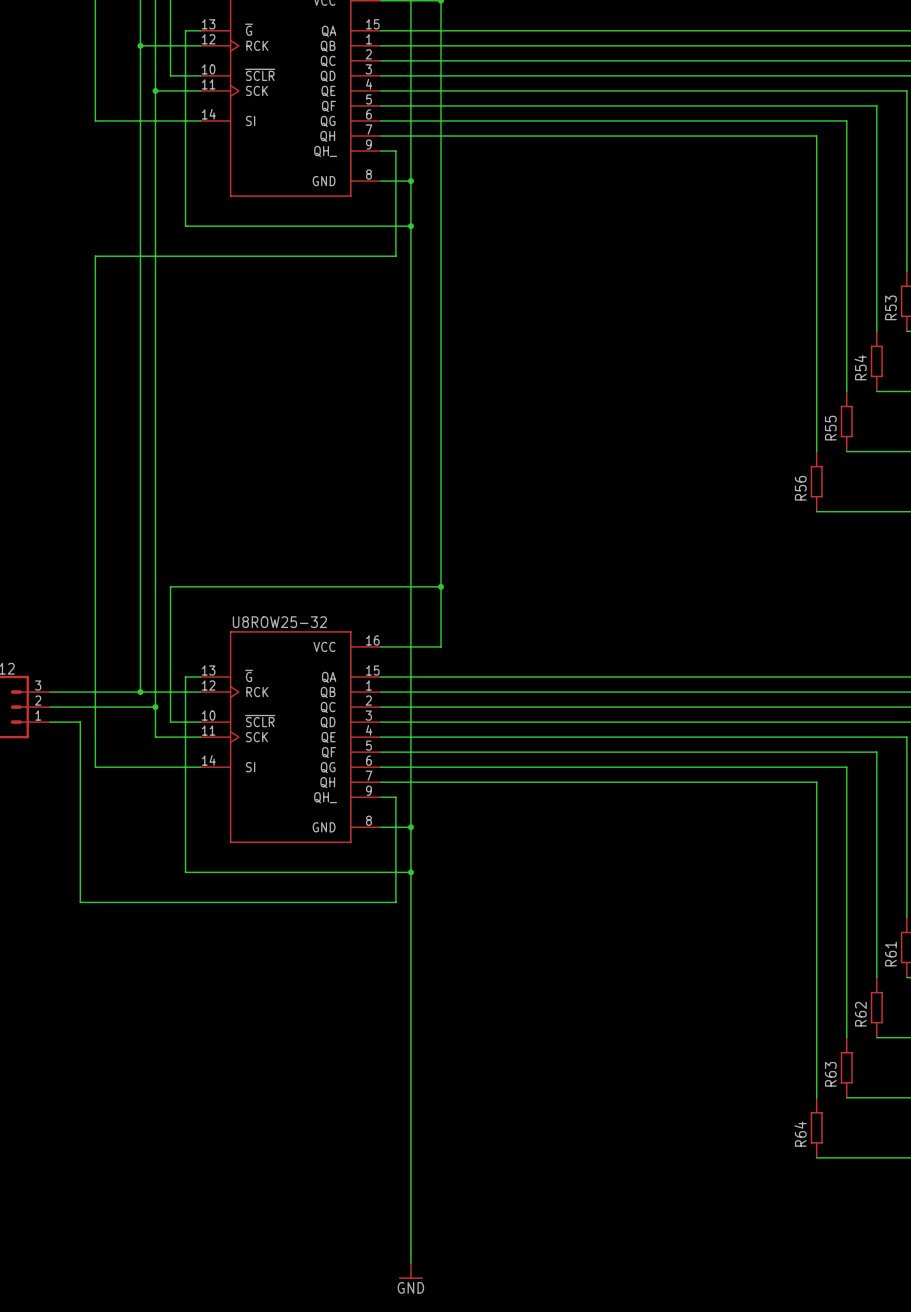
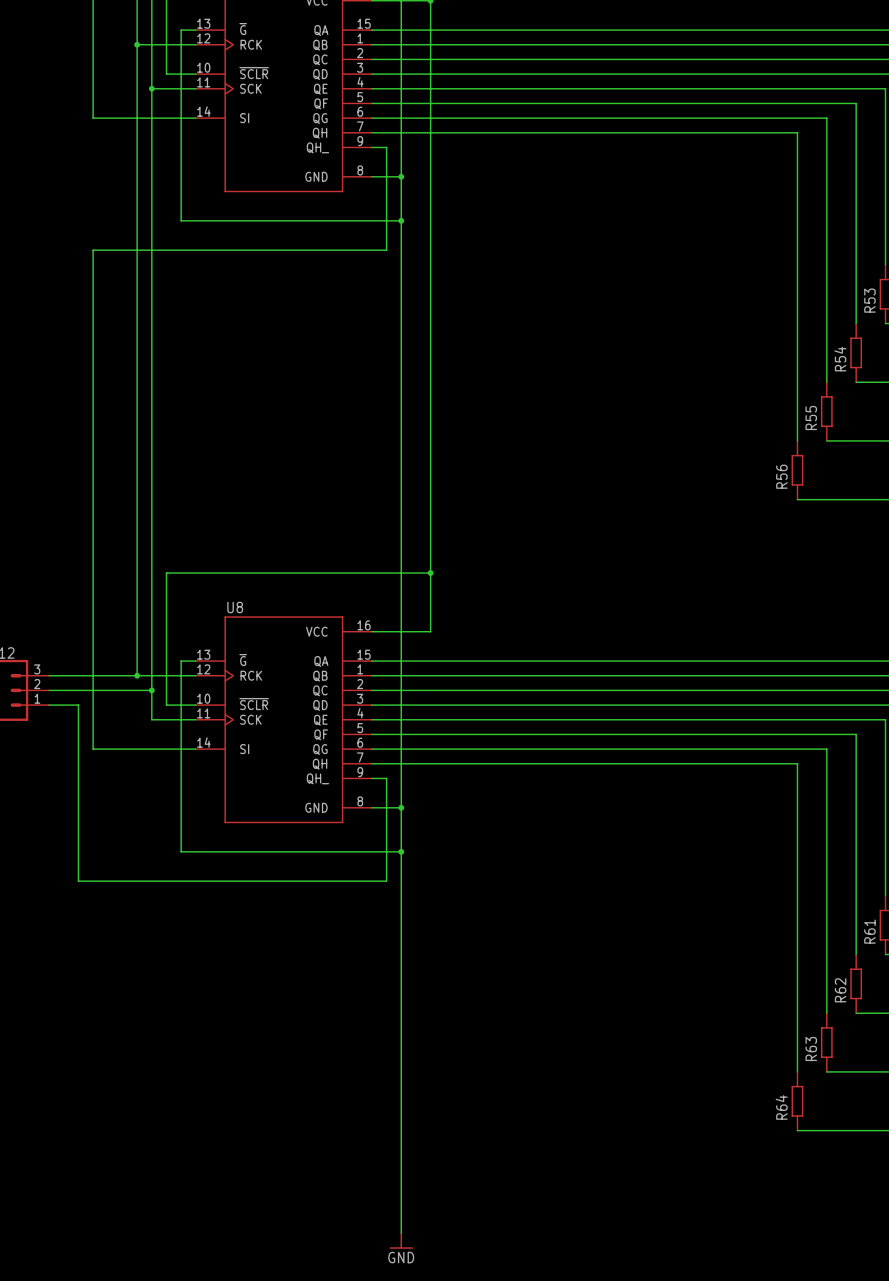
U8ROW25-32 name: U8ROW25-32 (279, 622) -> U8 (235, 607)

